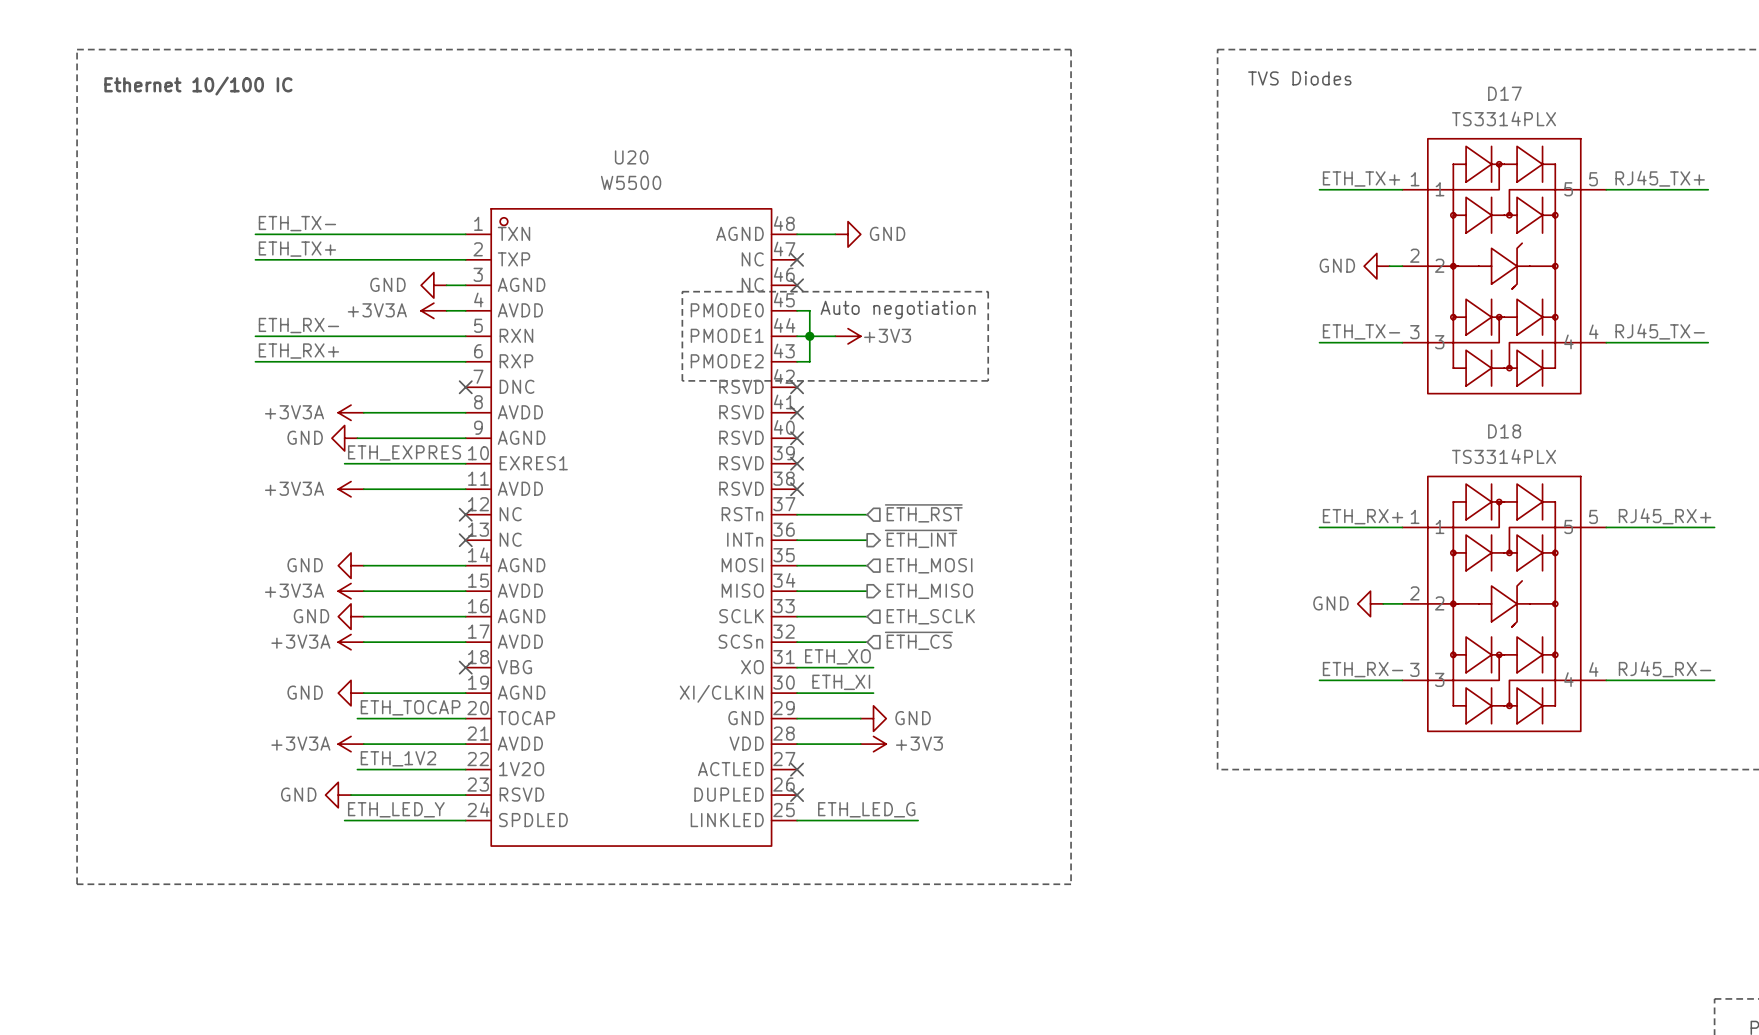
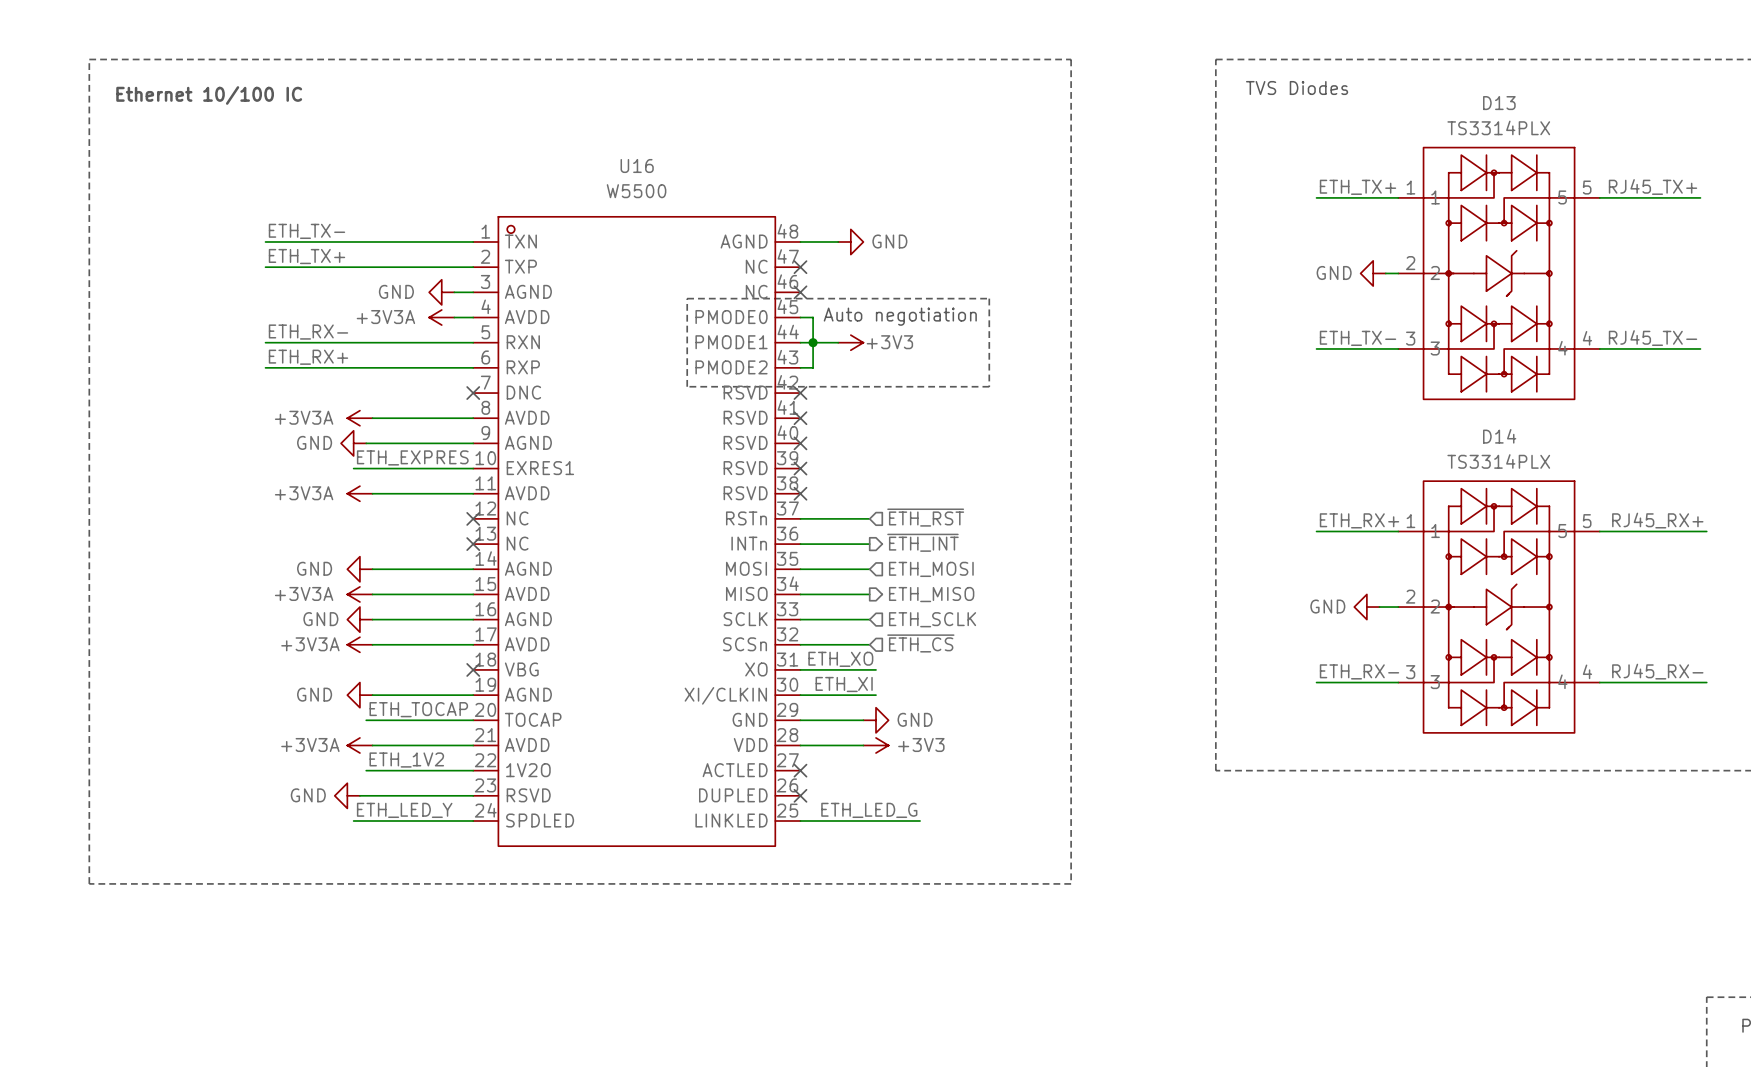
D17 name: D17 (1504, 93) -> D13 (1499, 103)
U20 name: U20 (631, 157) -> U16 (637, 166)
D18 name: D18 (1504, 431) -> D14 (1499, 436)

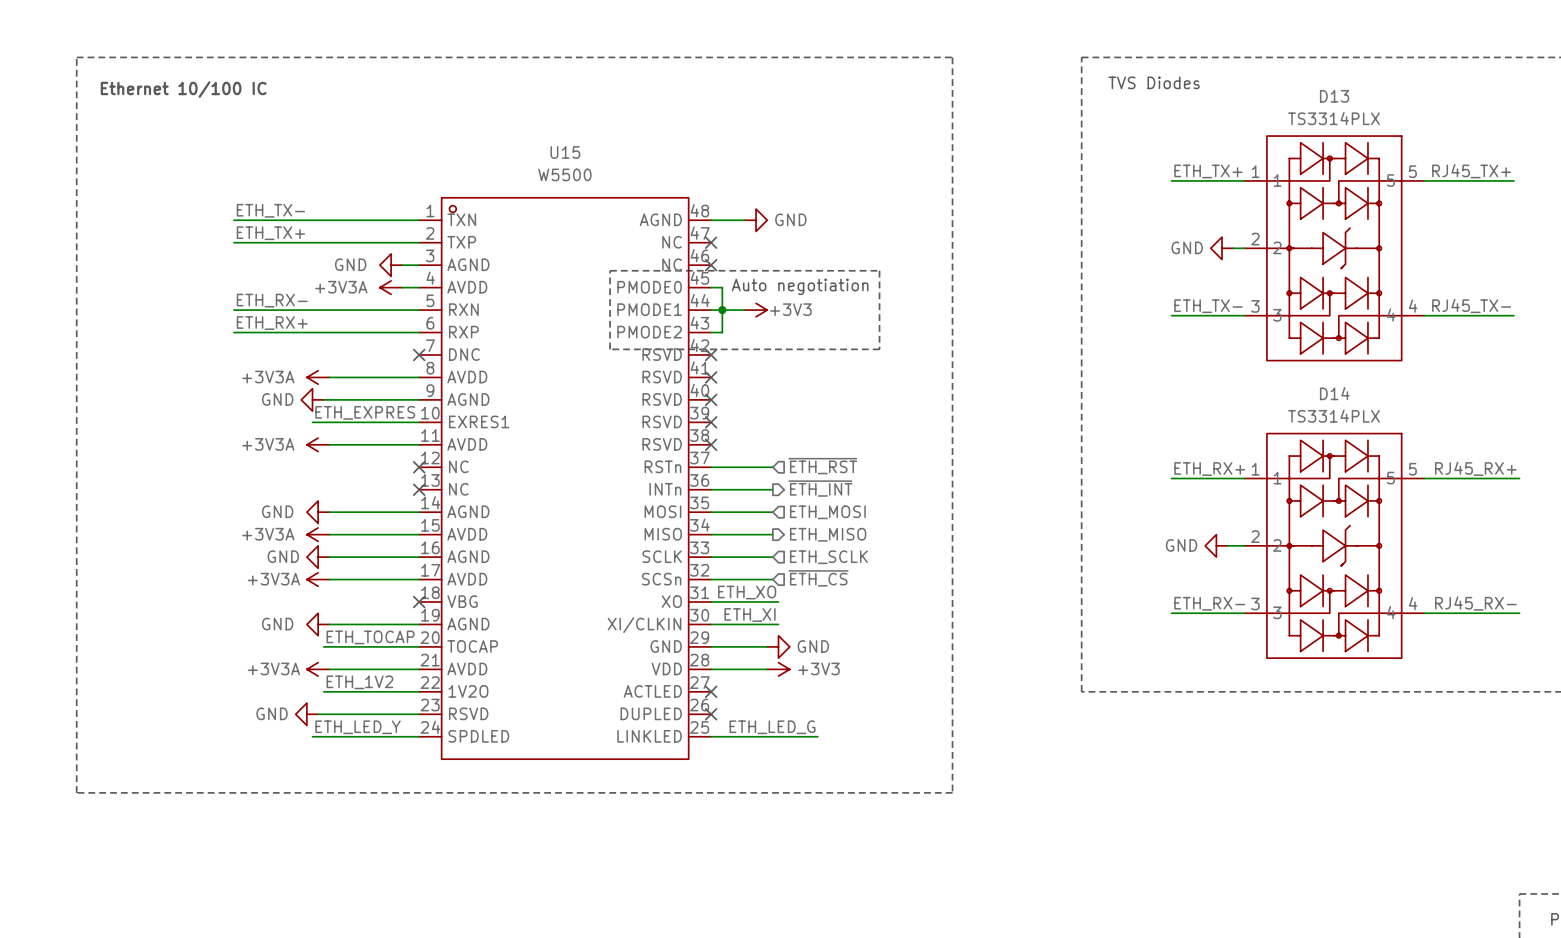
U16 name: U16 (637, 166) -> U15 (565, 152)

